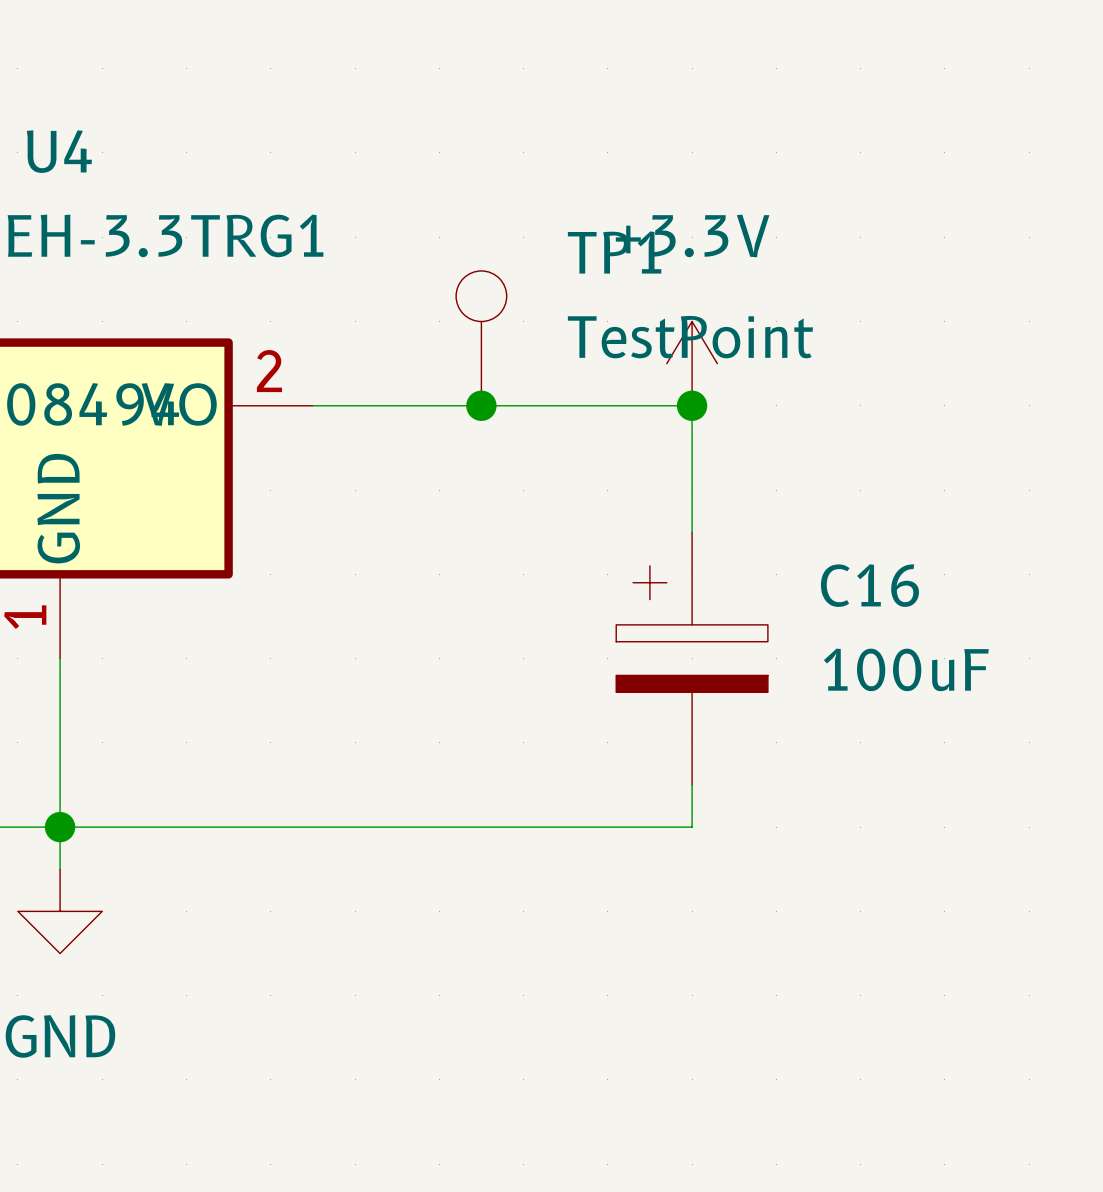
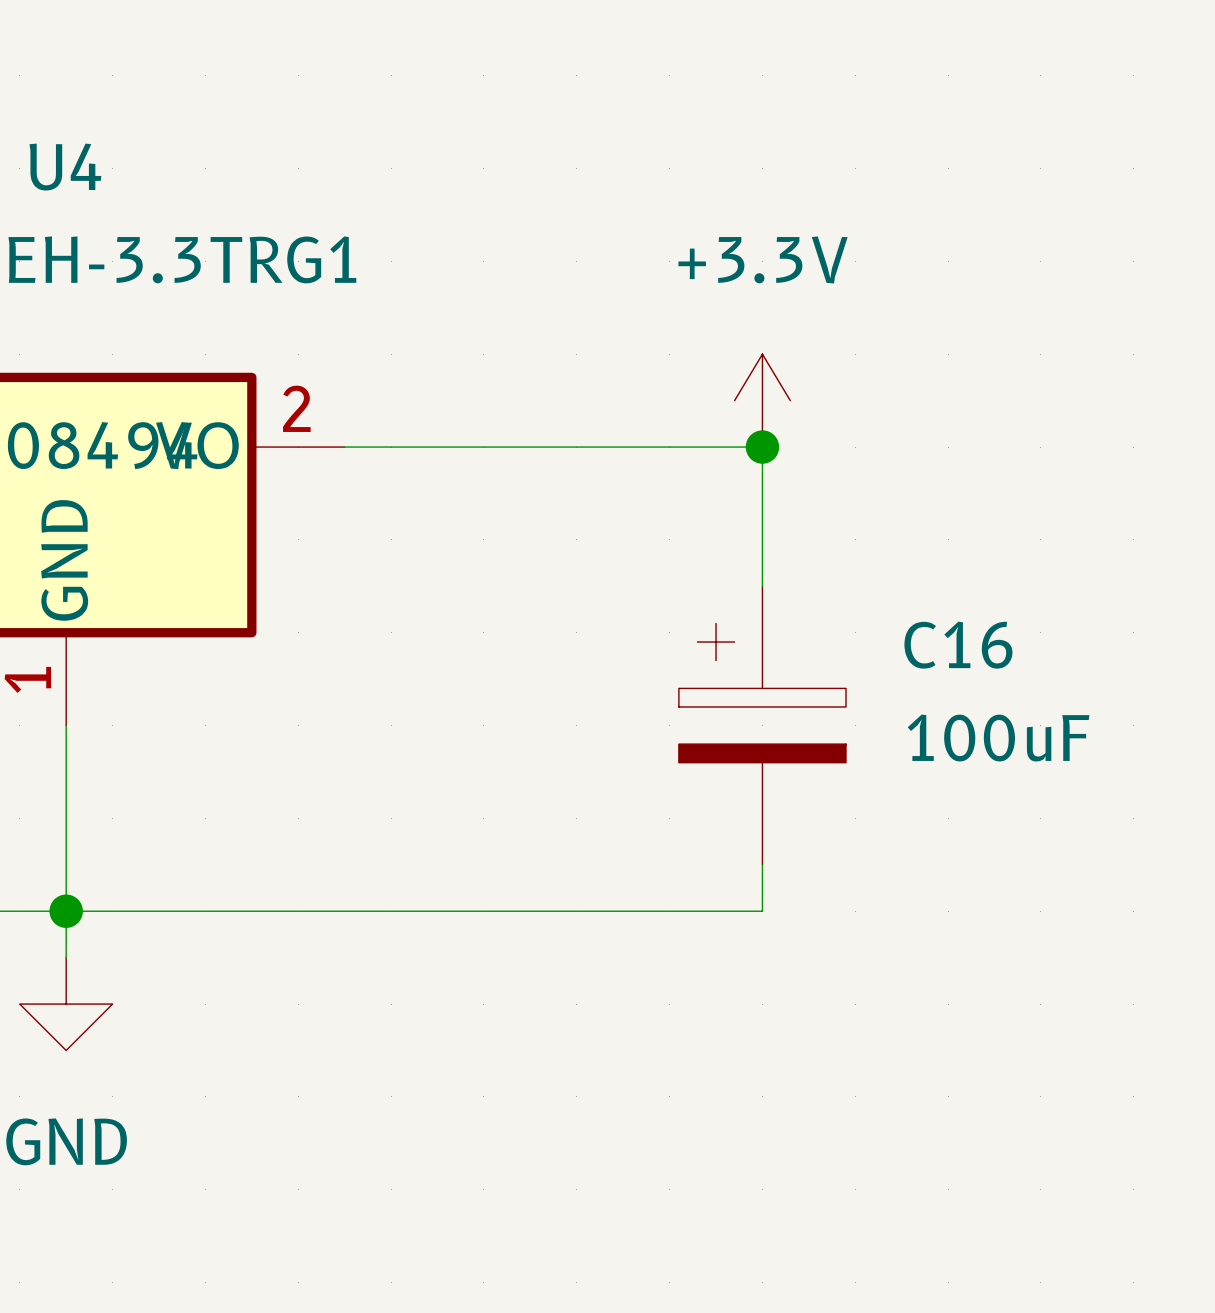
TP1: TestPoint (481, 338) -> none
junction: (481, 405) -> none

